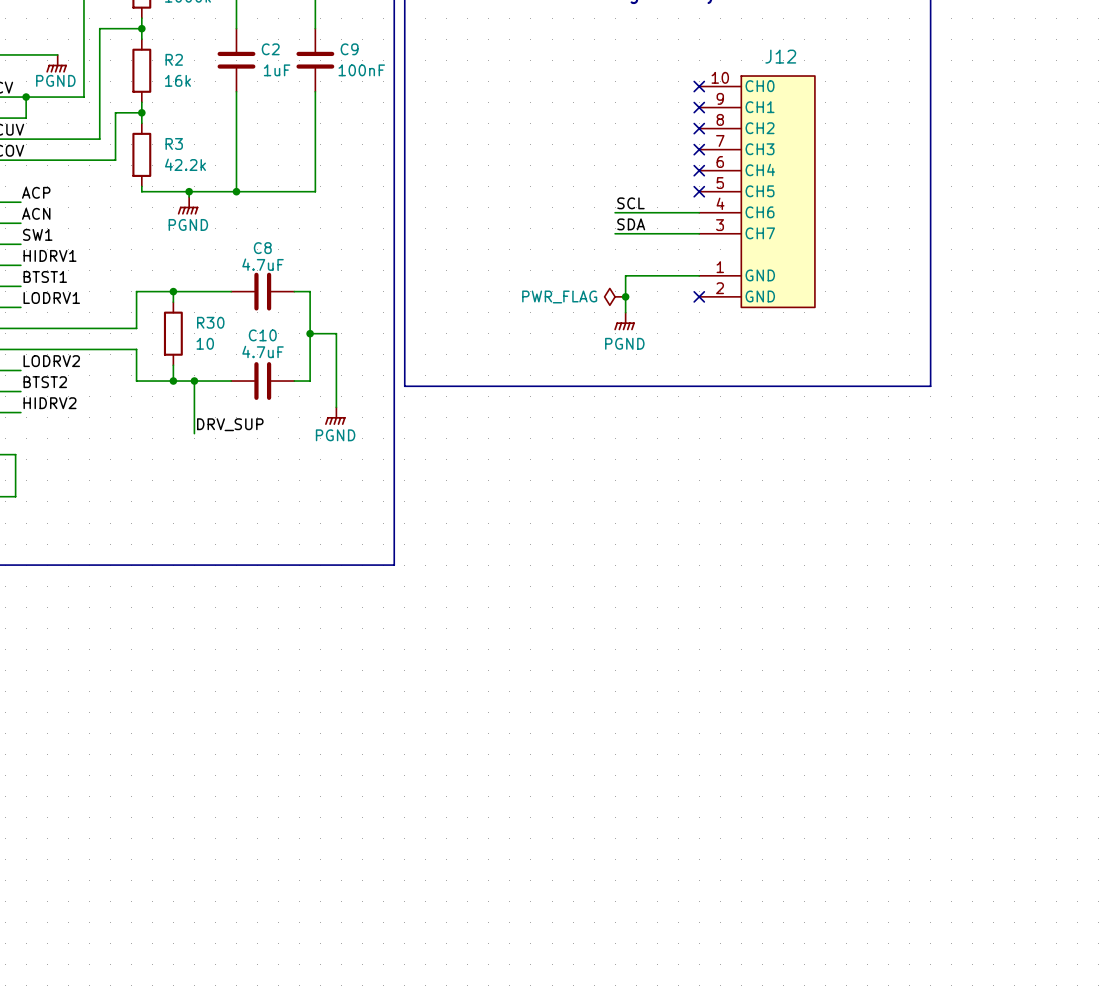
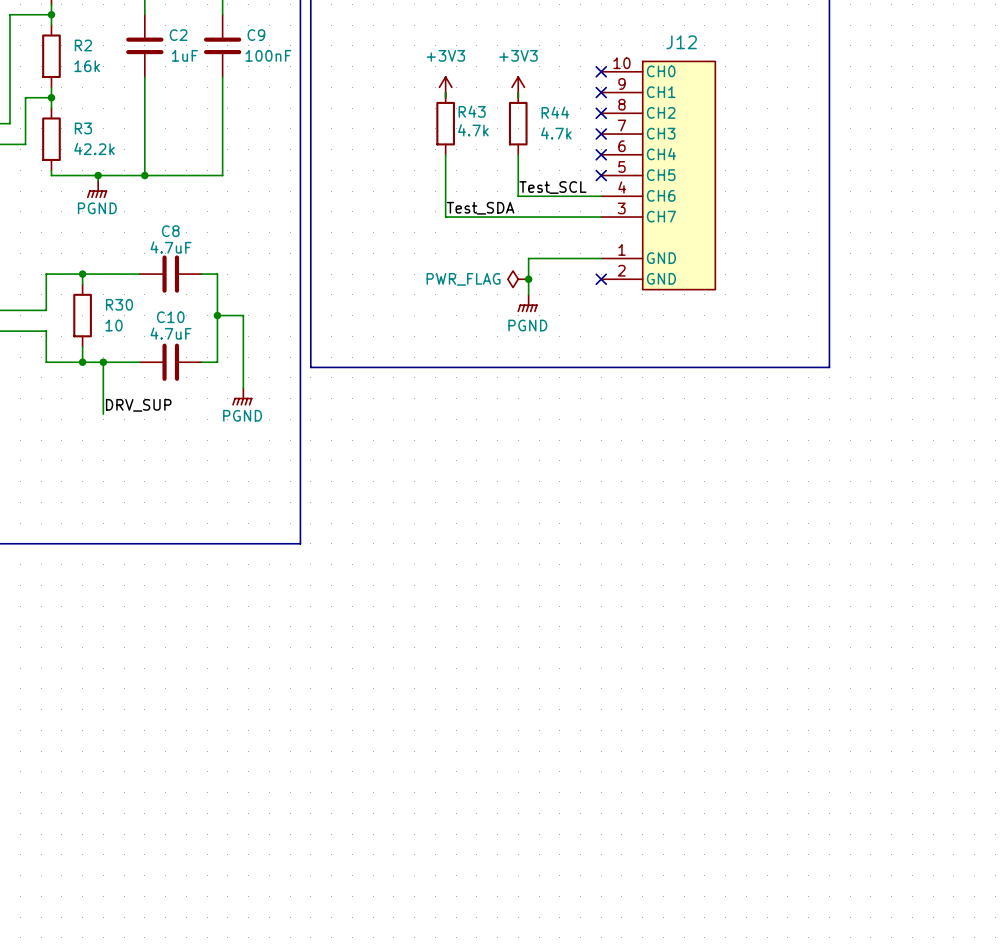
power symbol: none -> +3V3 (445, 87)
power symbol: none -> +3V3 (518, 87)
wire: none -> (445, 92) (445, 97)
wire: none -> (518, 92) (518, 97)
R43: none -> 4.7k (445, 123)
R44: none -> 4.7k (518, 123)
wire: none -> (445, 154) (445, 217) (518, 217)
wire: none -> (518, 154) (518, 196)
label: SCL (630, 203) -> Test_SCL (552, 187)
label: none -> Test_SDA (480, 208)
label: SDA (631, 224) -> none

